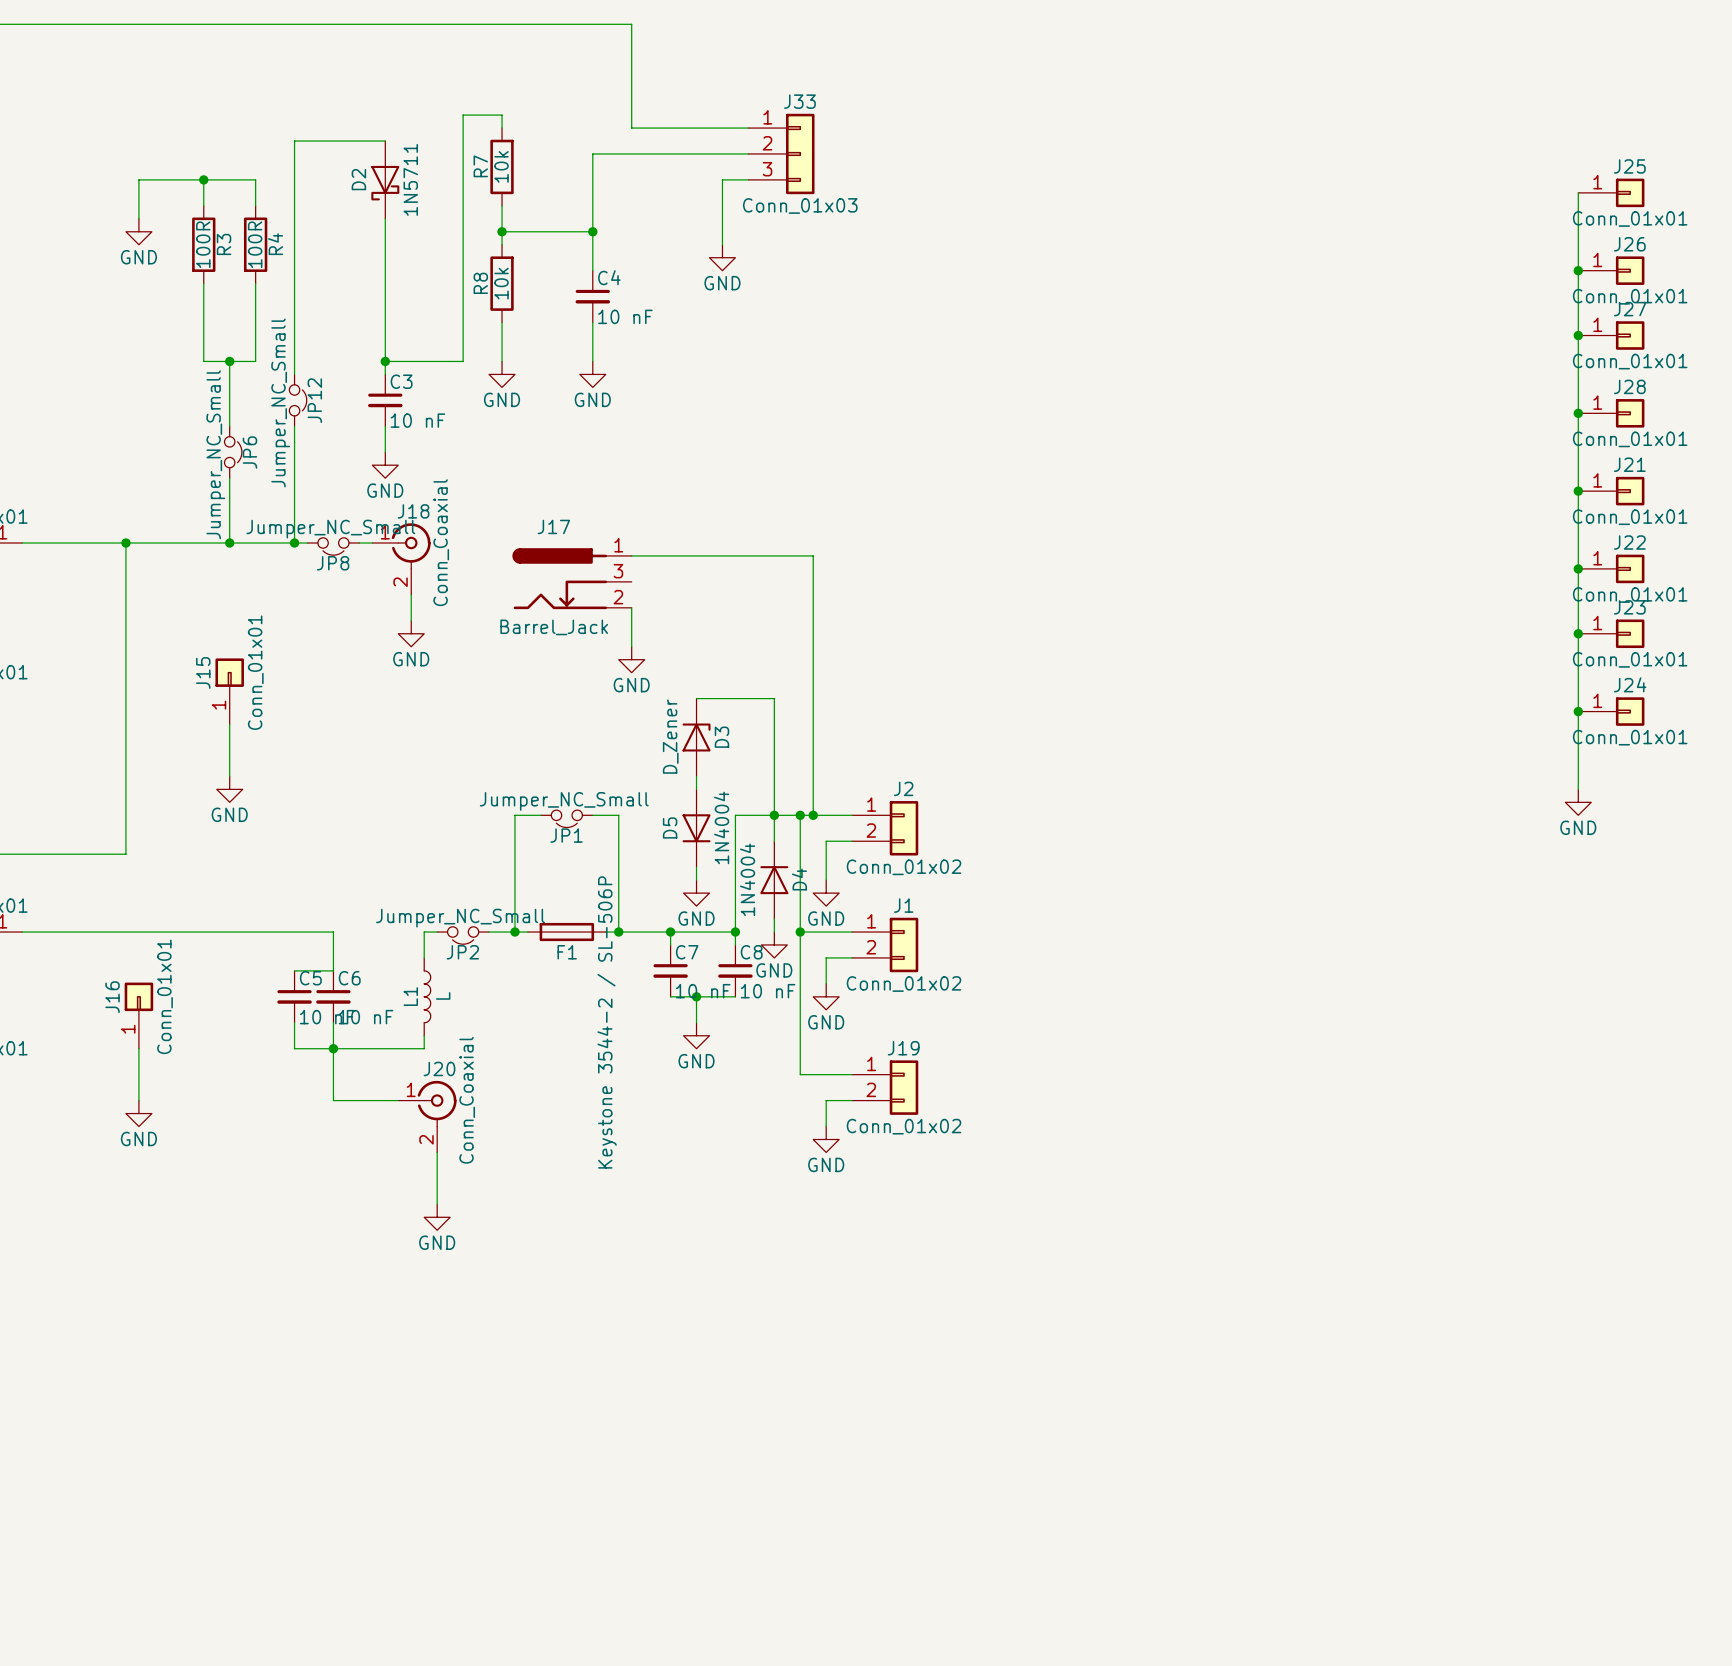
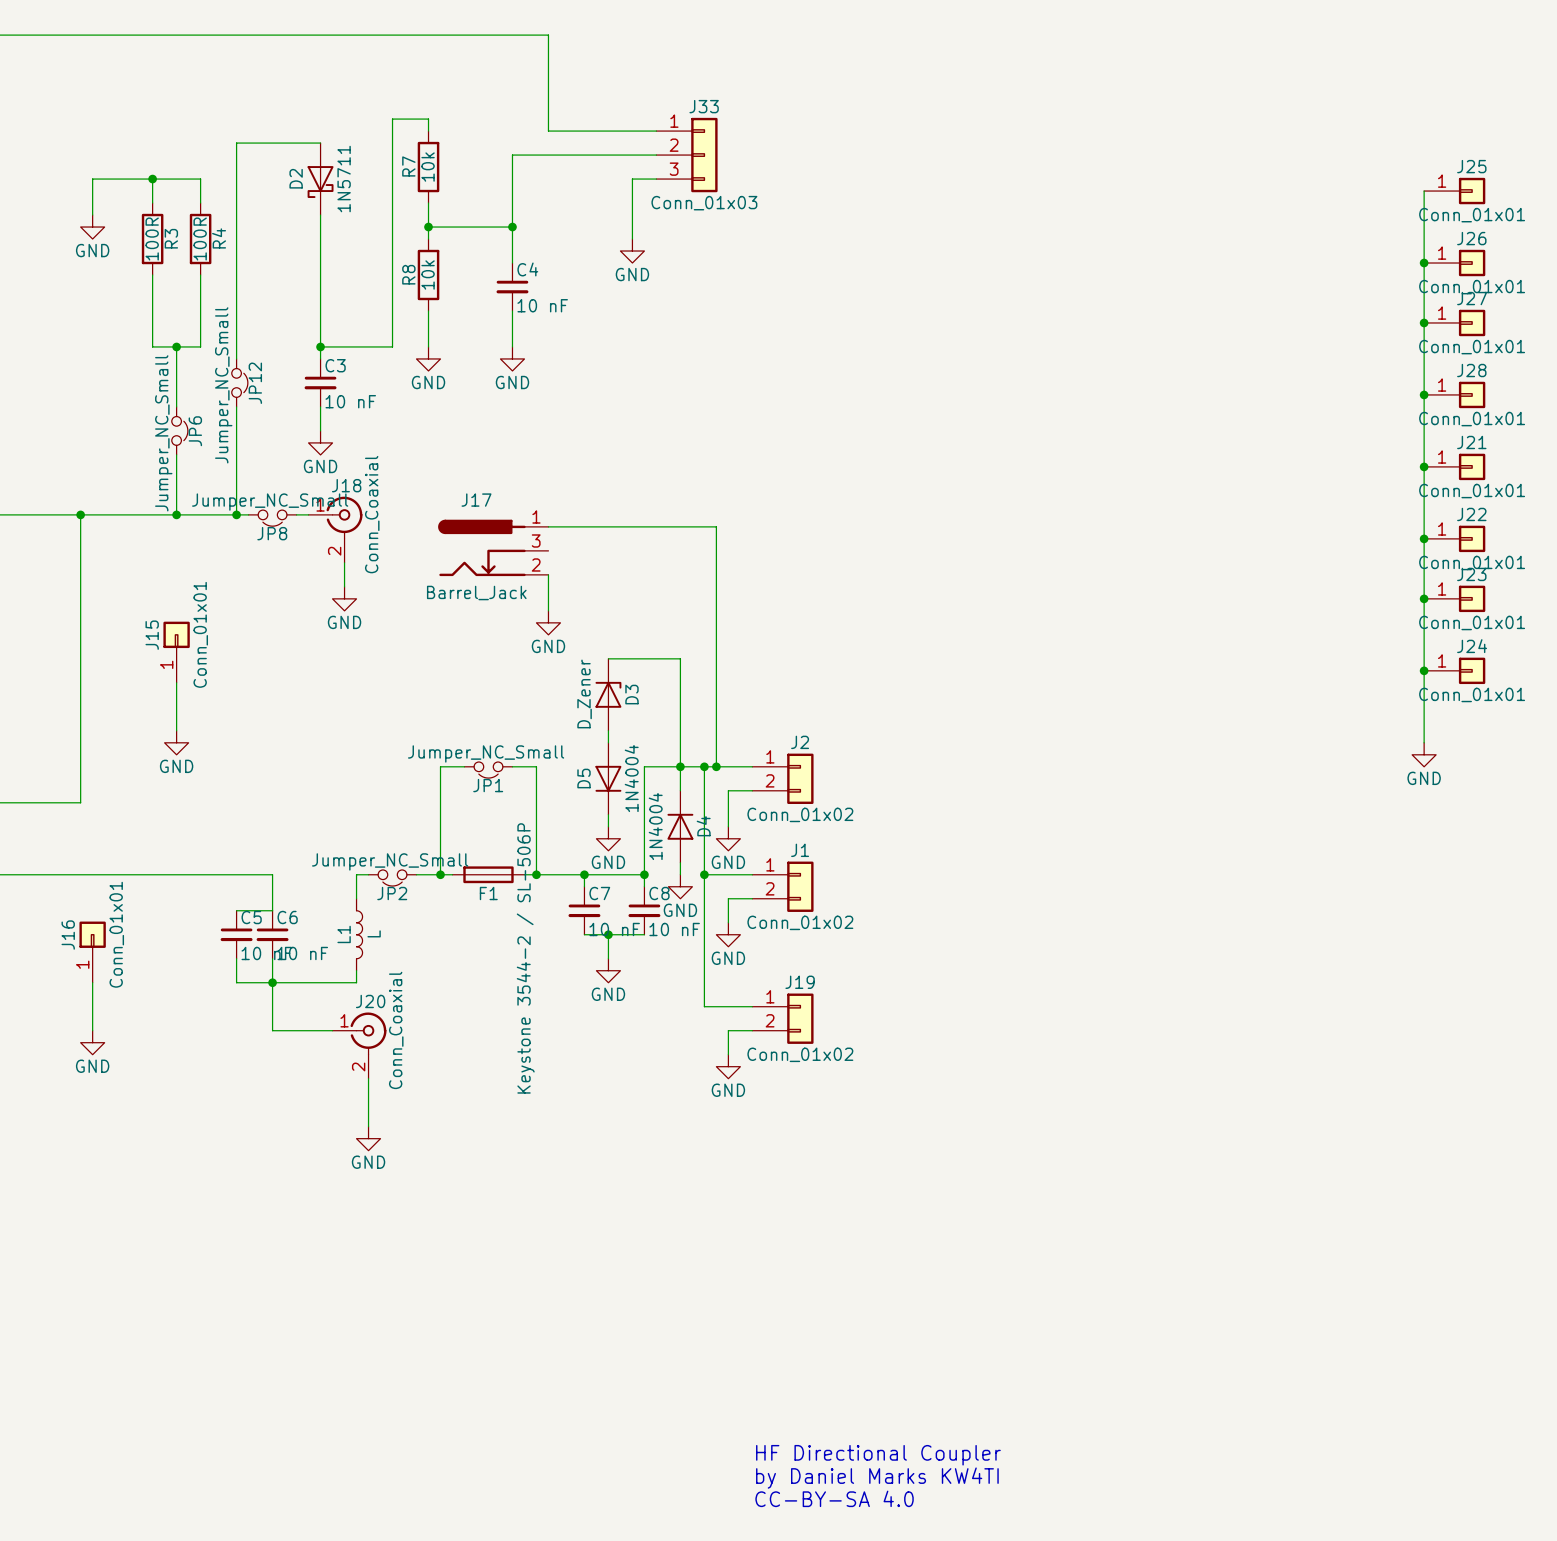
text: none -> HF Directional Coupler (878, 1455)
text: none -> by Daniel Marks KW4TI (877, 1478)
text: none -> CC-BY-SA 4.0 (834, 1498)

